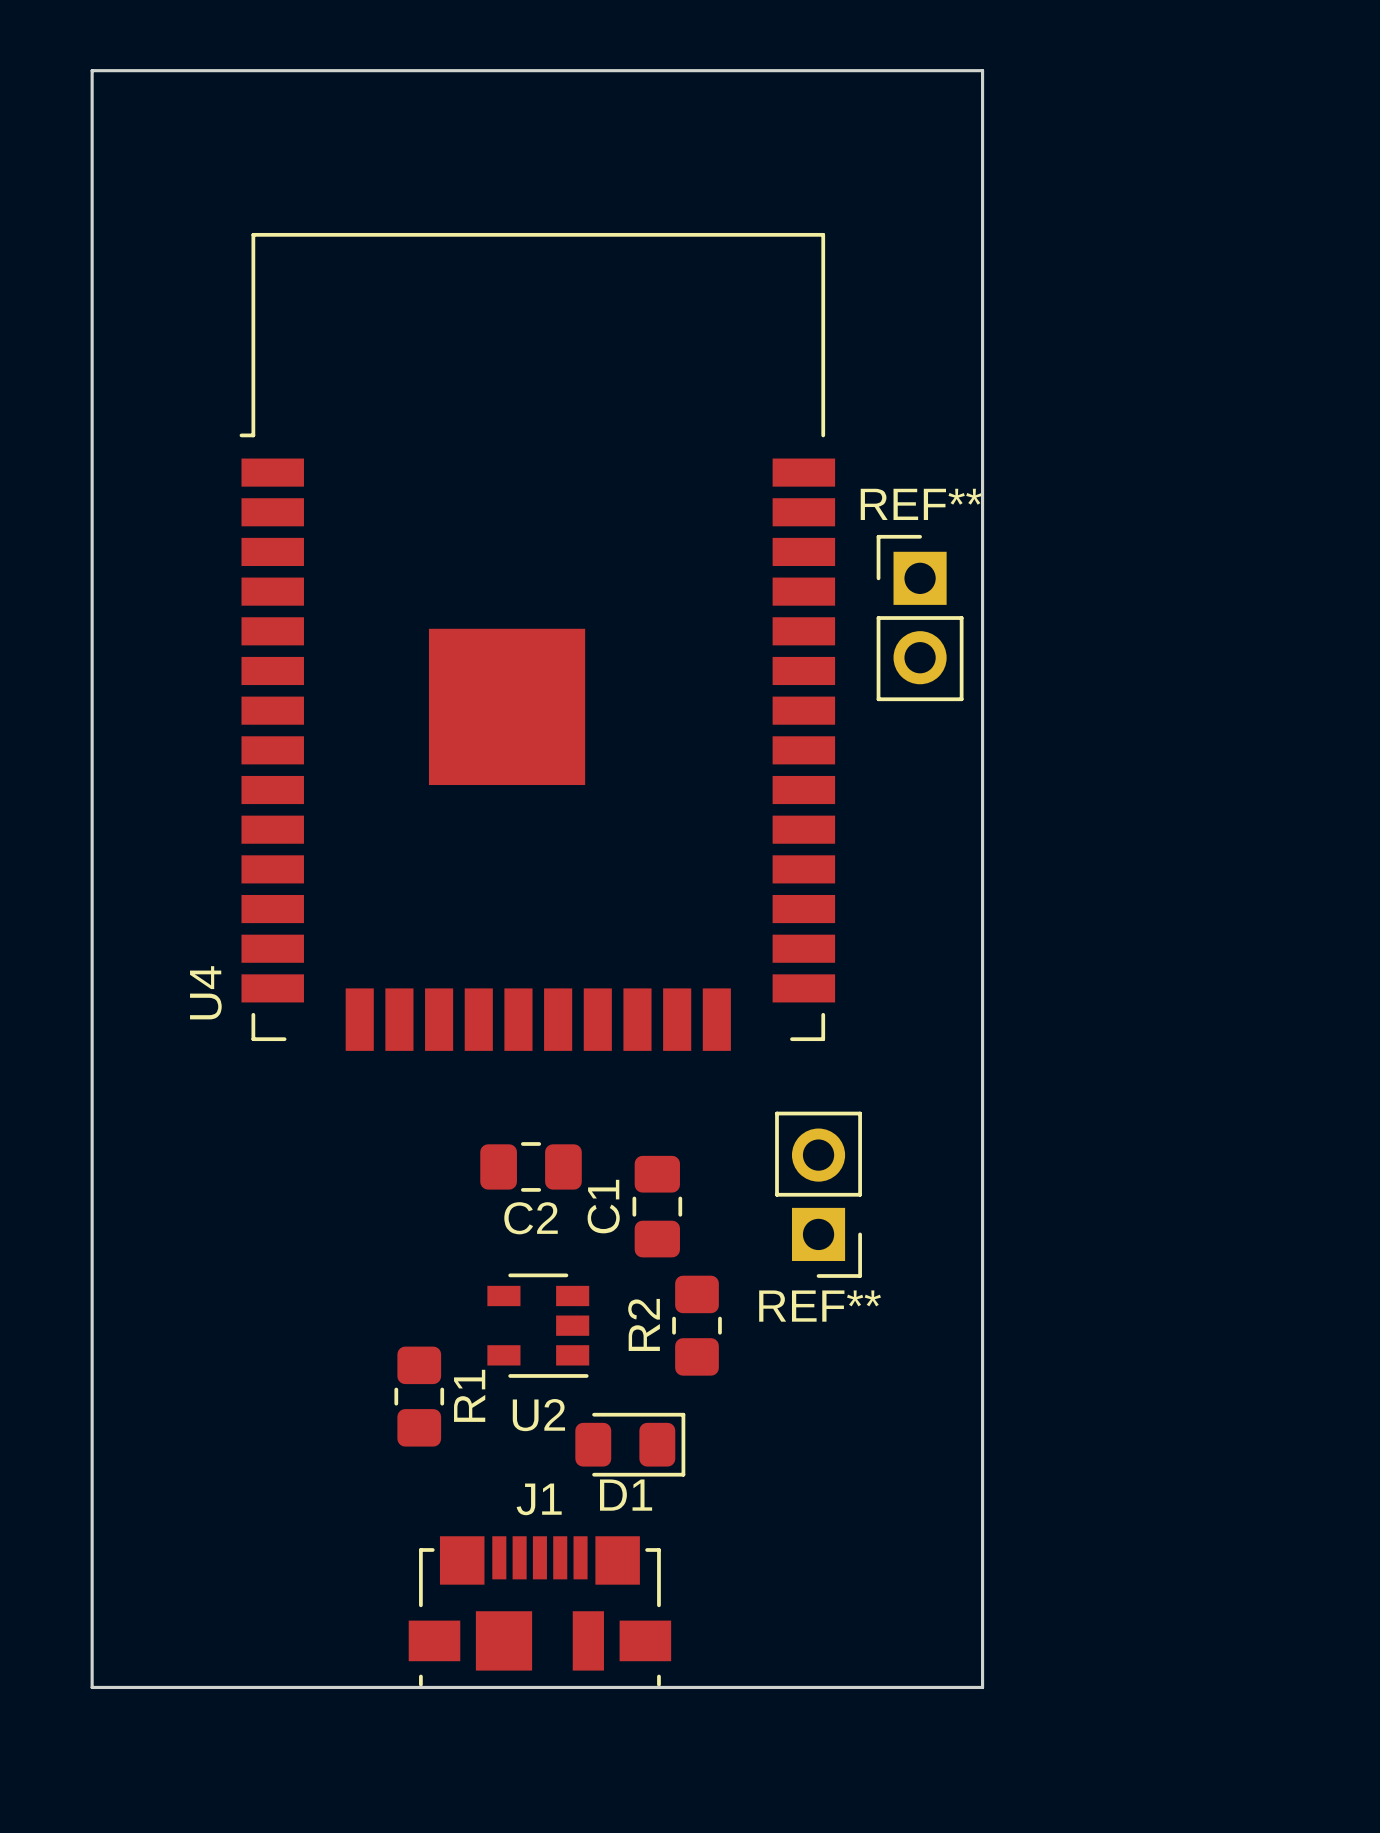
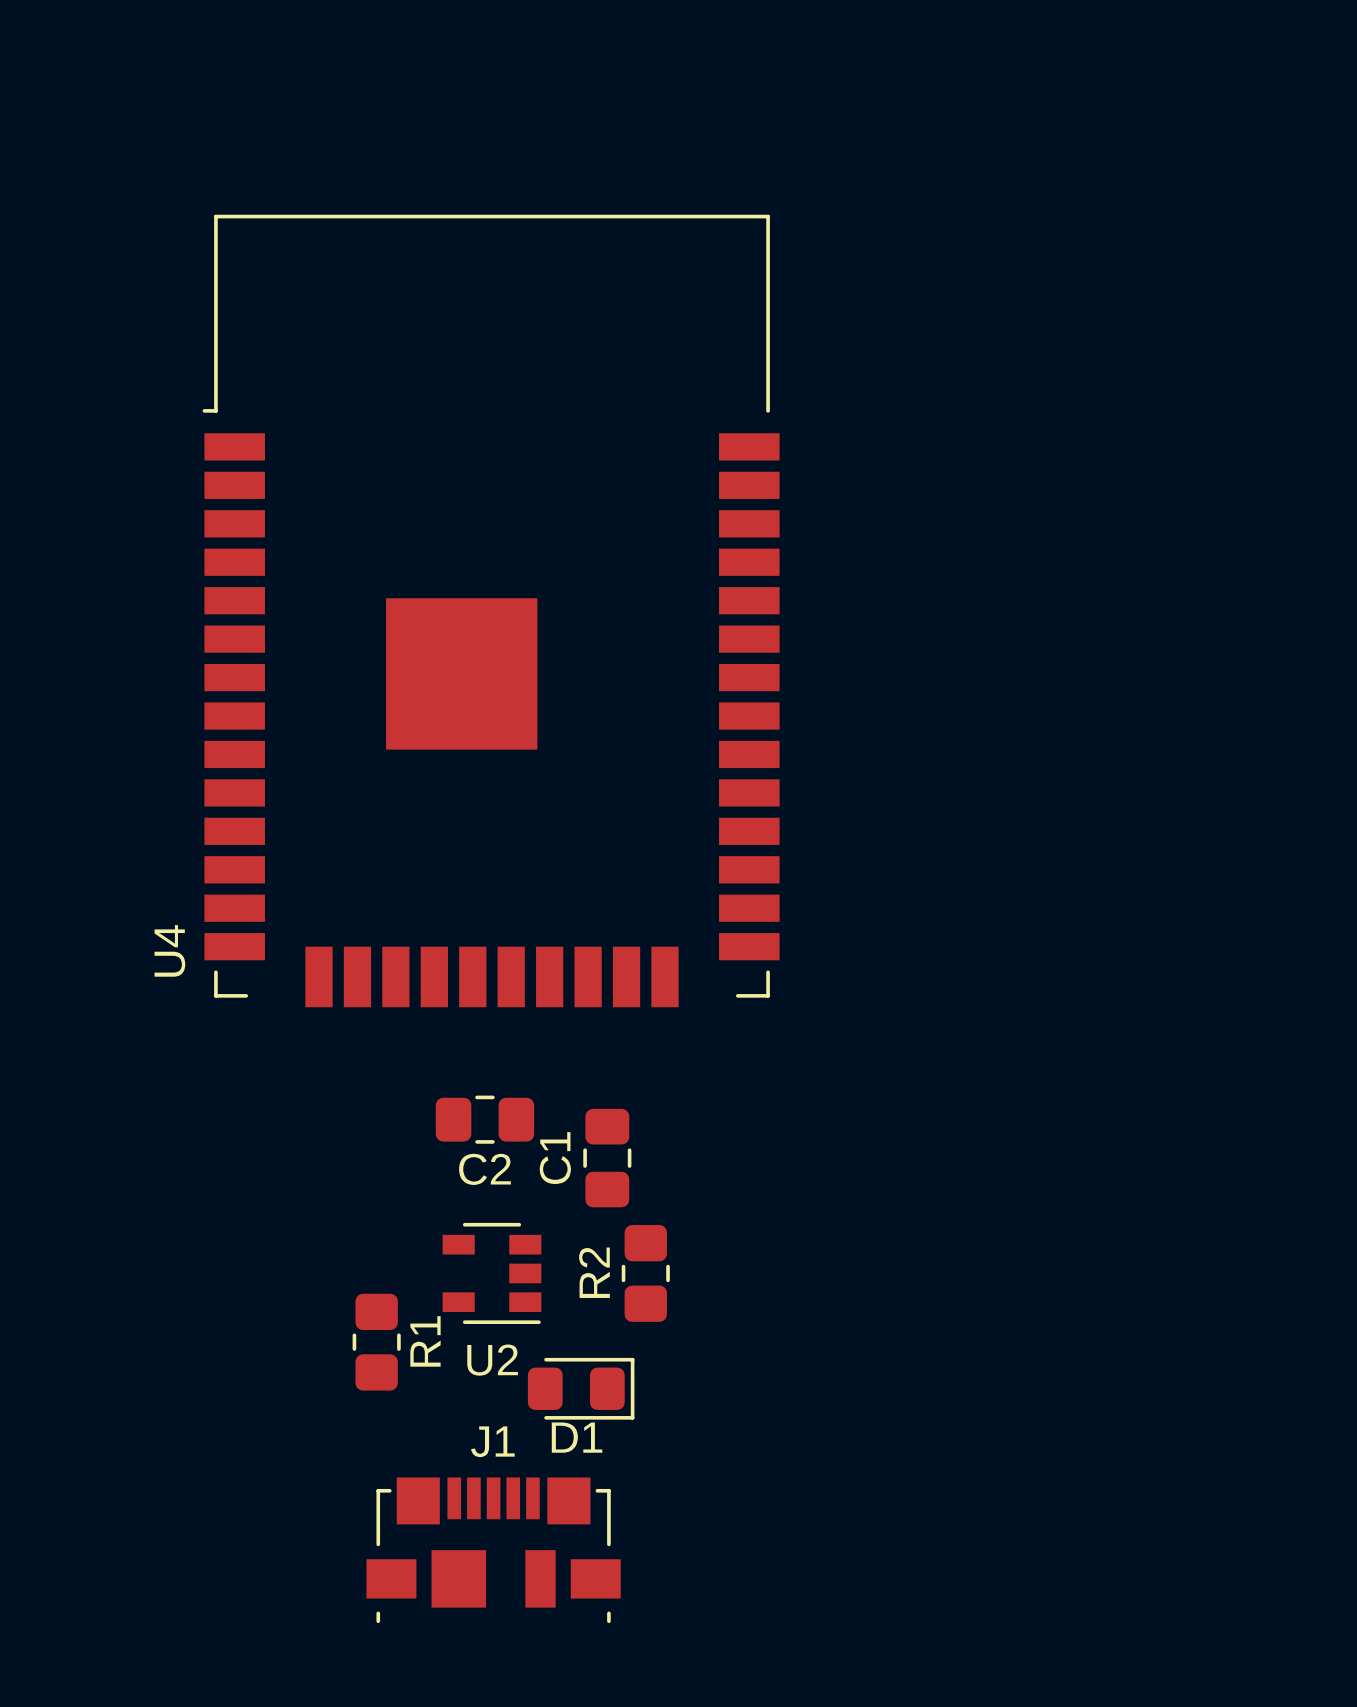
board edge: (92, 70) (982, 70) (982, 1687) (92, 1687) (92, 70) -> none
REF**: (920, 618) -> none
REF**: (818, 1194) -> none

